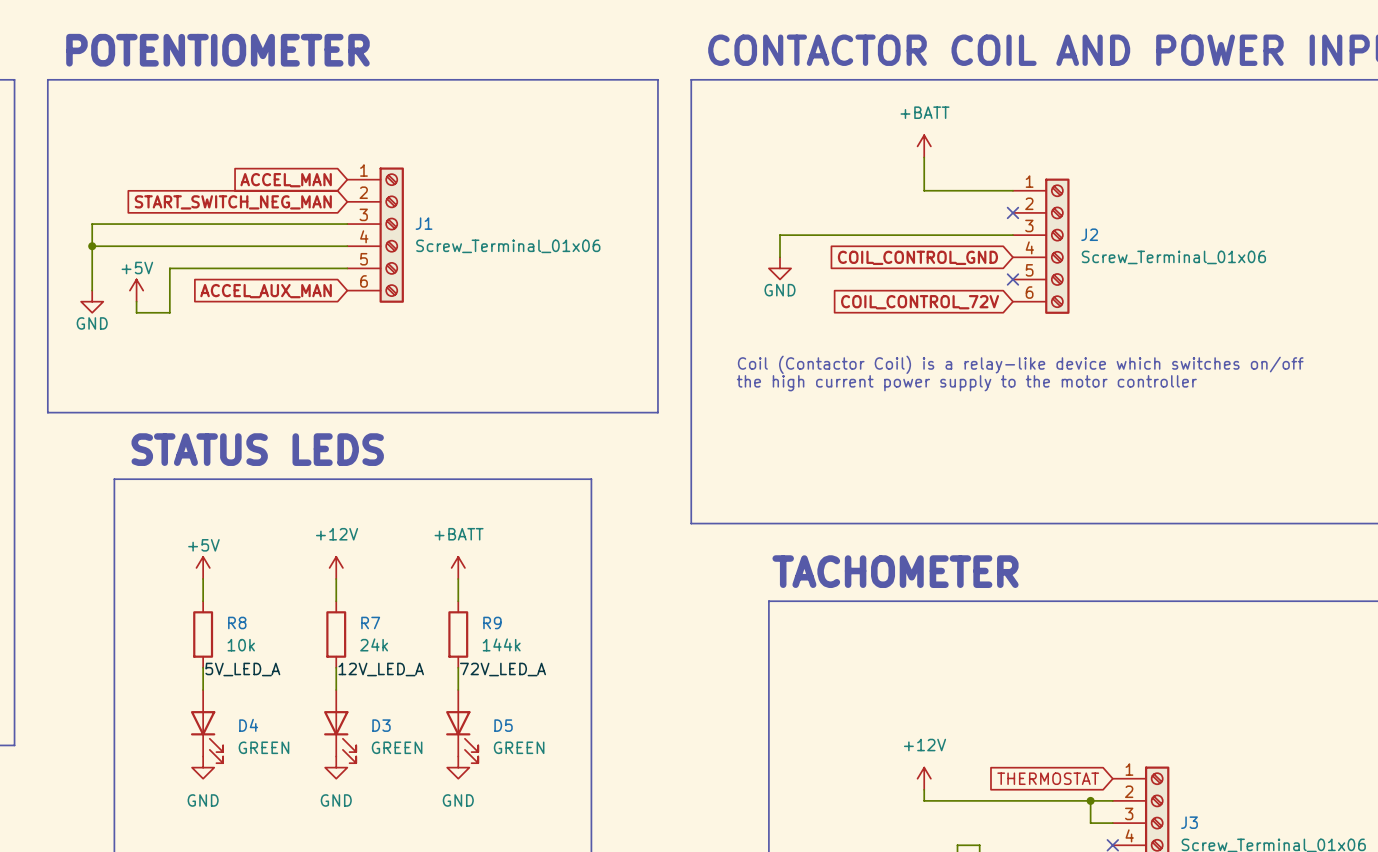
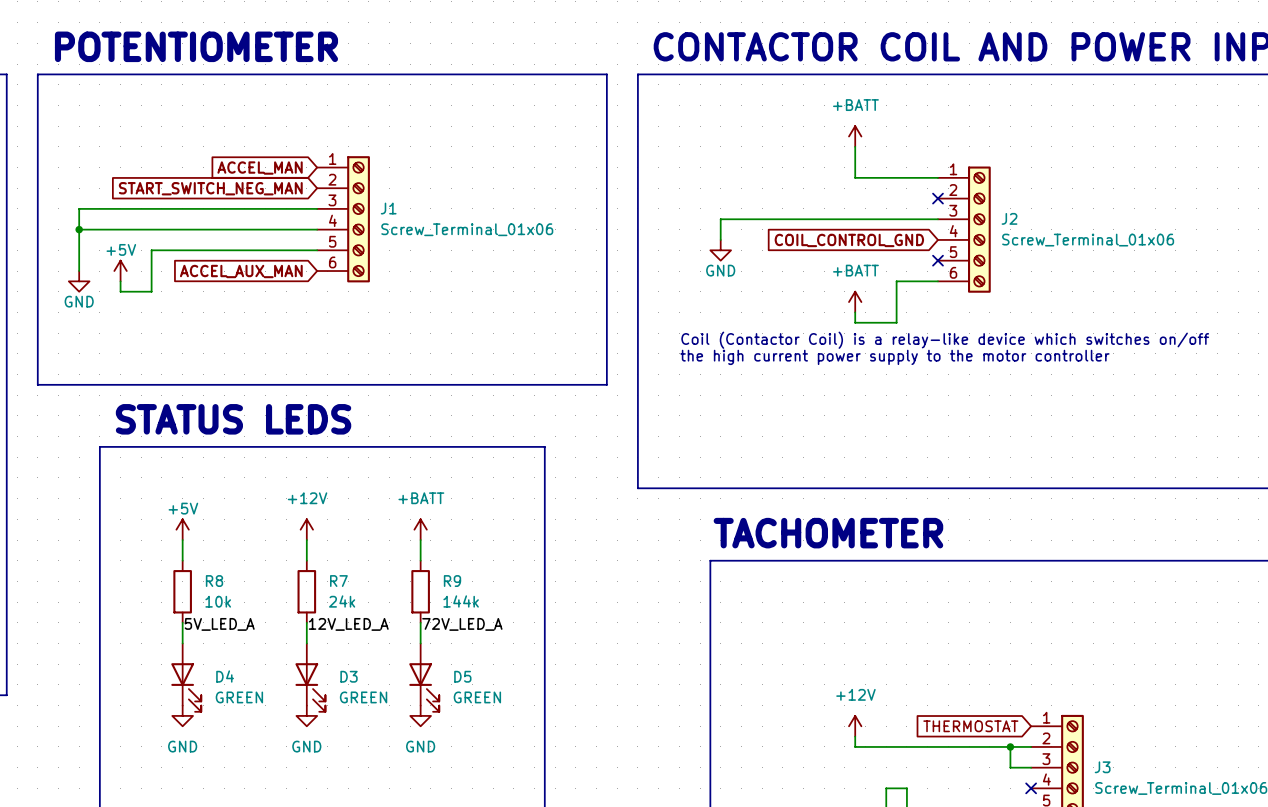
wire: none -> (937, 281) (896, 281) (896, 322) (855, 322) (855, 312)
global label: COIL_CONTROL_72V (920, 302) -> none
power symbol: none -> +BATT (855, 302)

